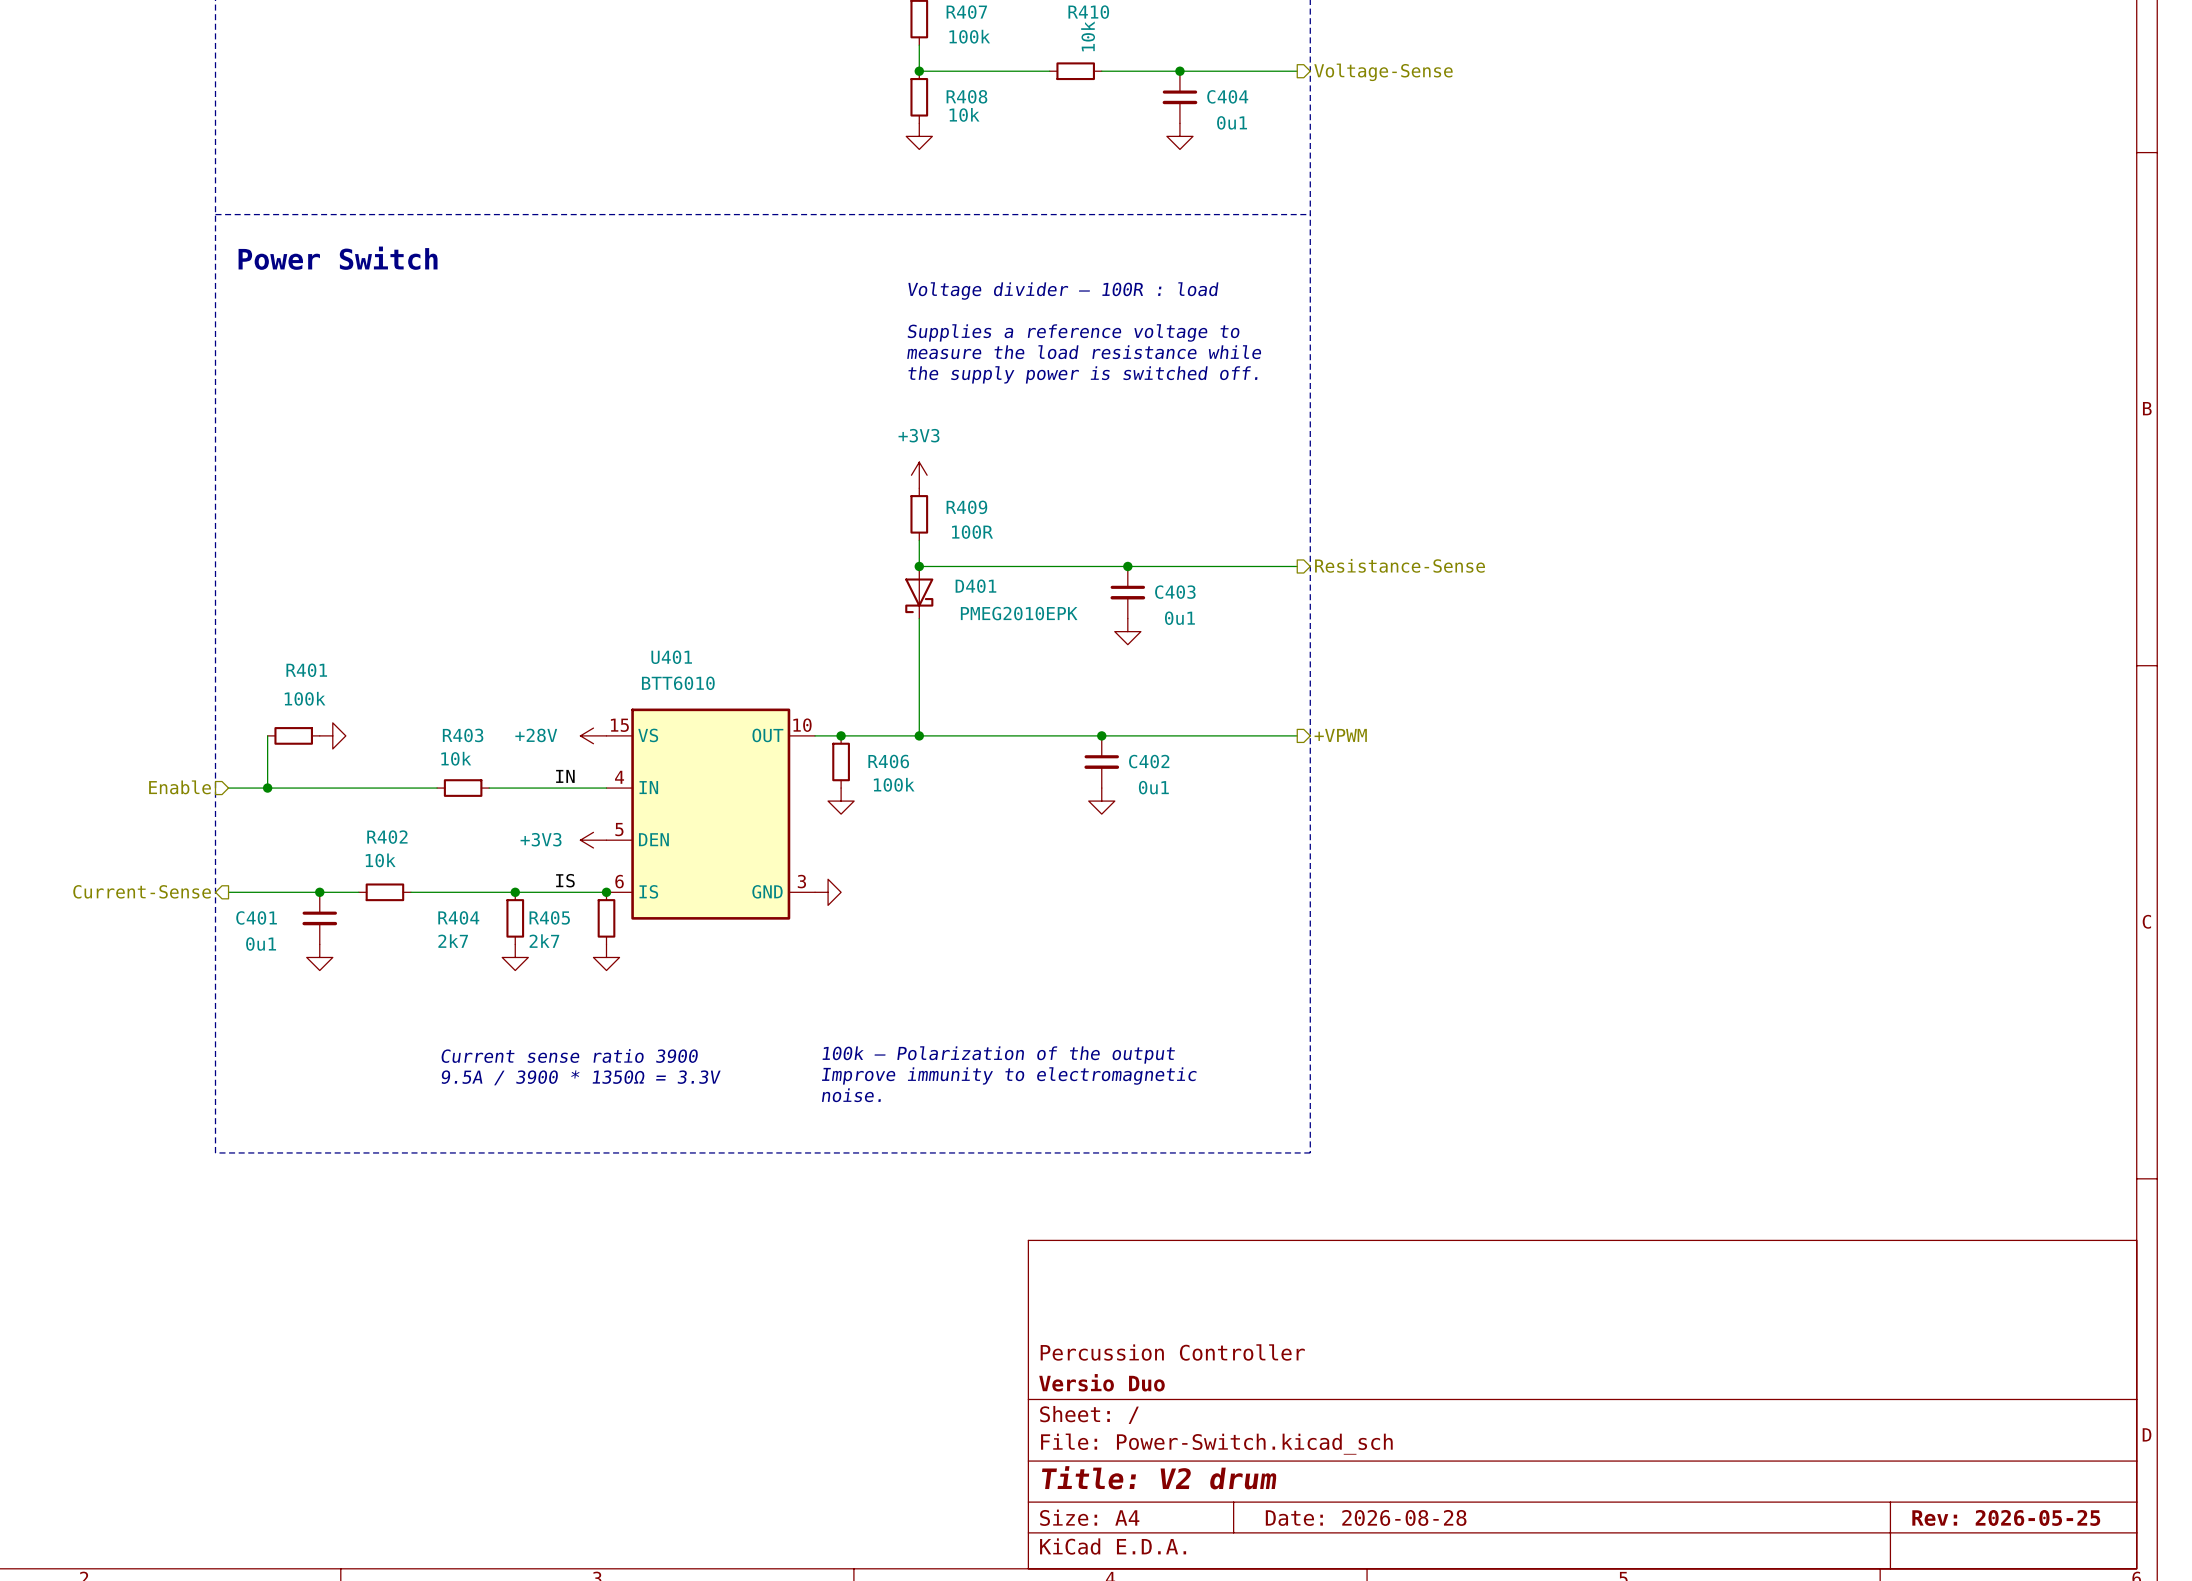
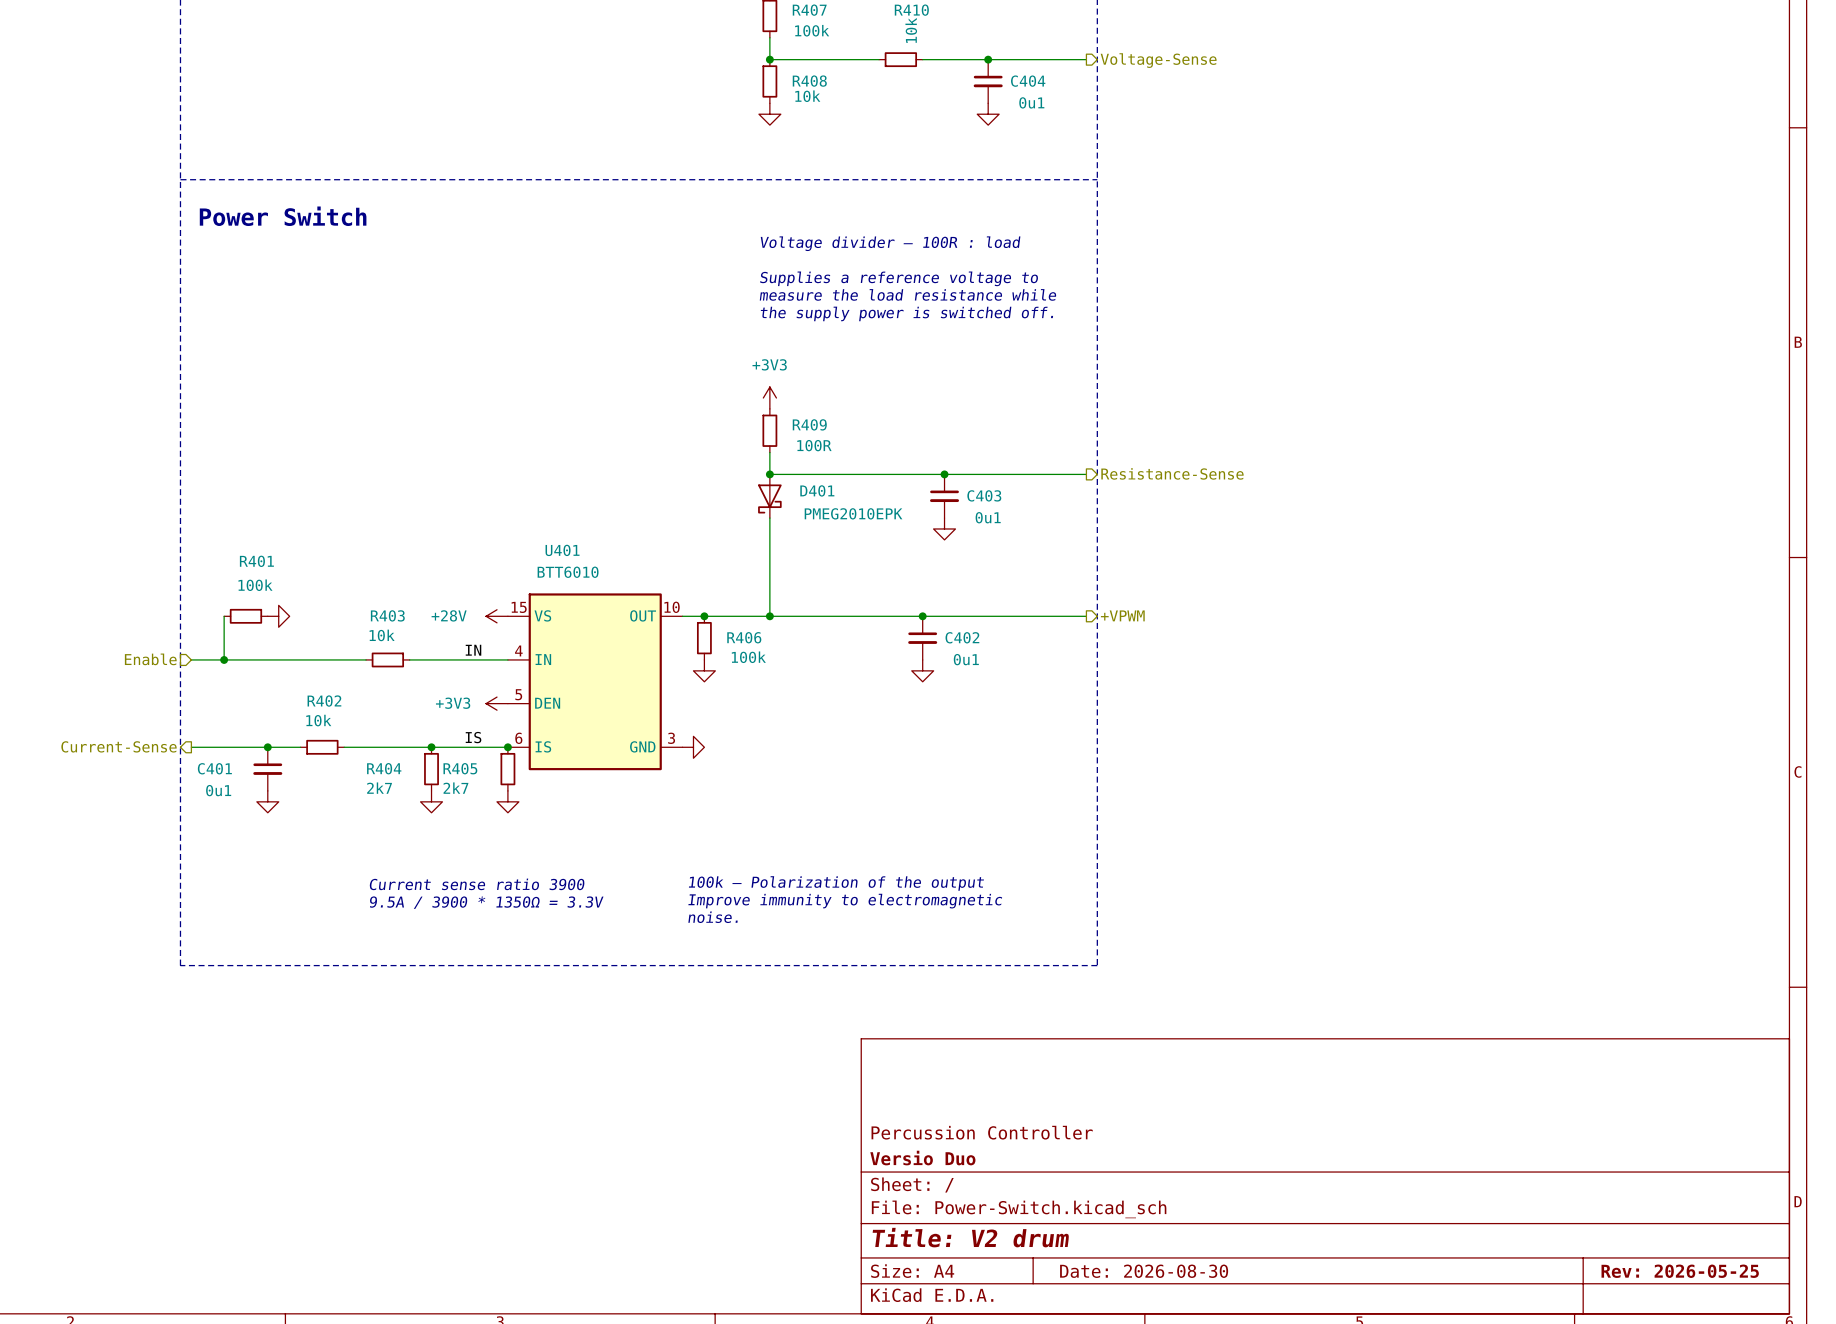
title block: Date: 2026-08-28 (1366, 1517) -> Date: 2026-08-30 (1144, 1271)

